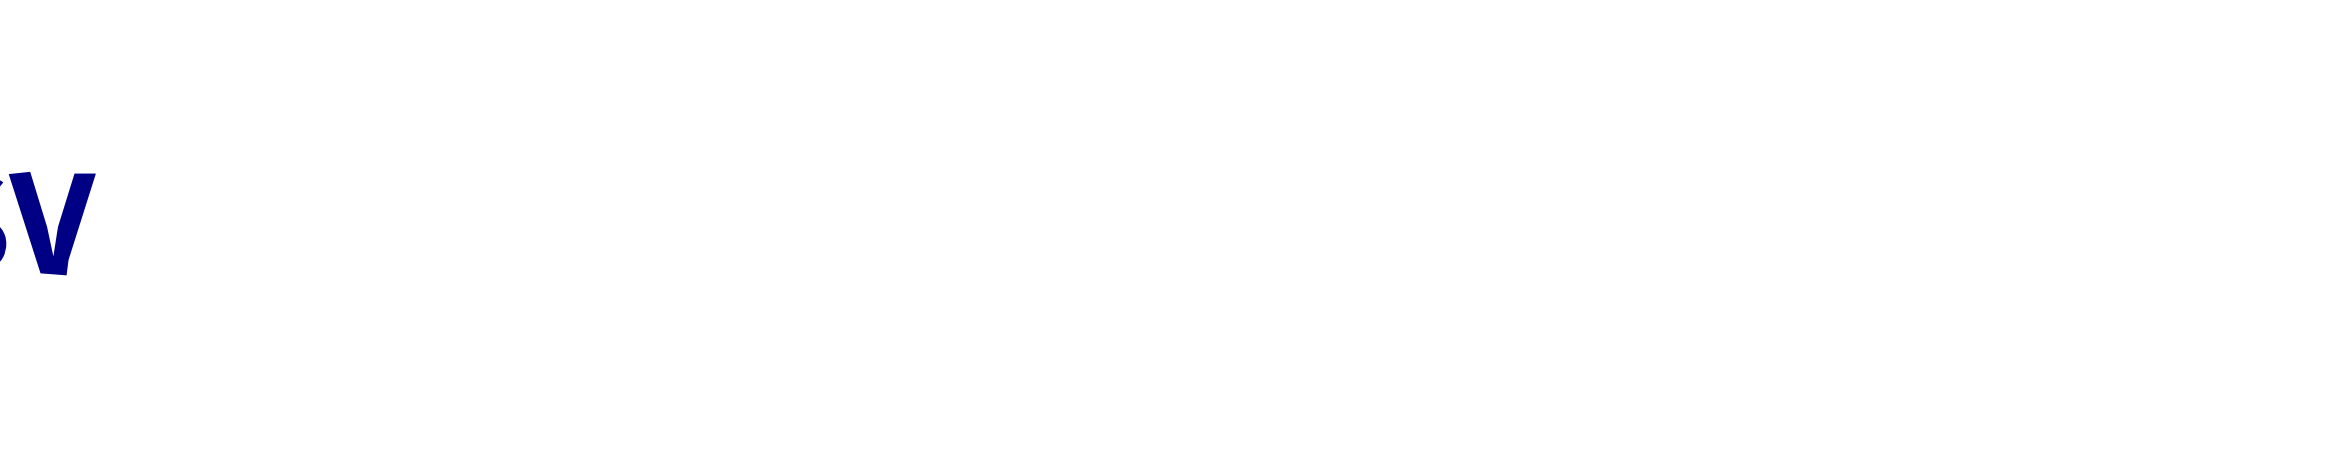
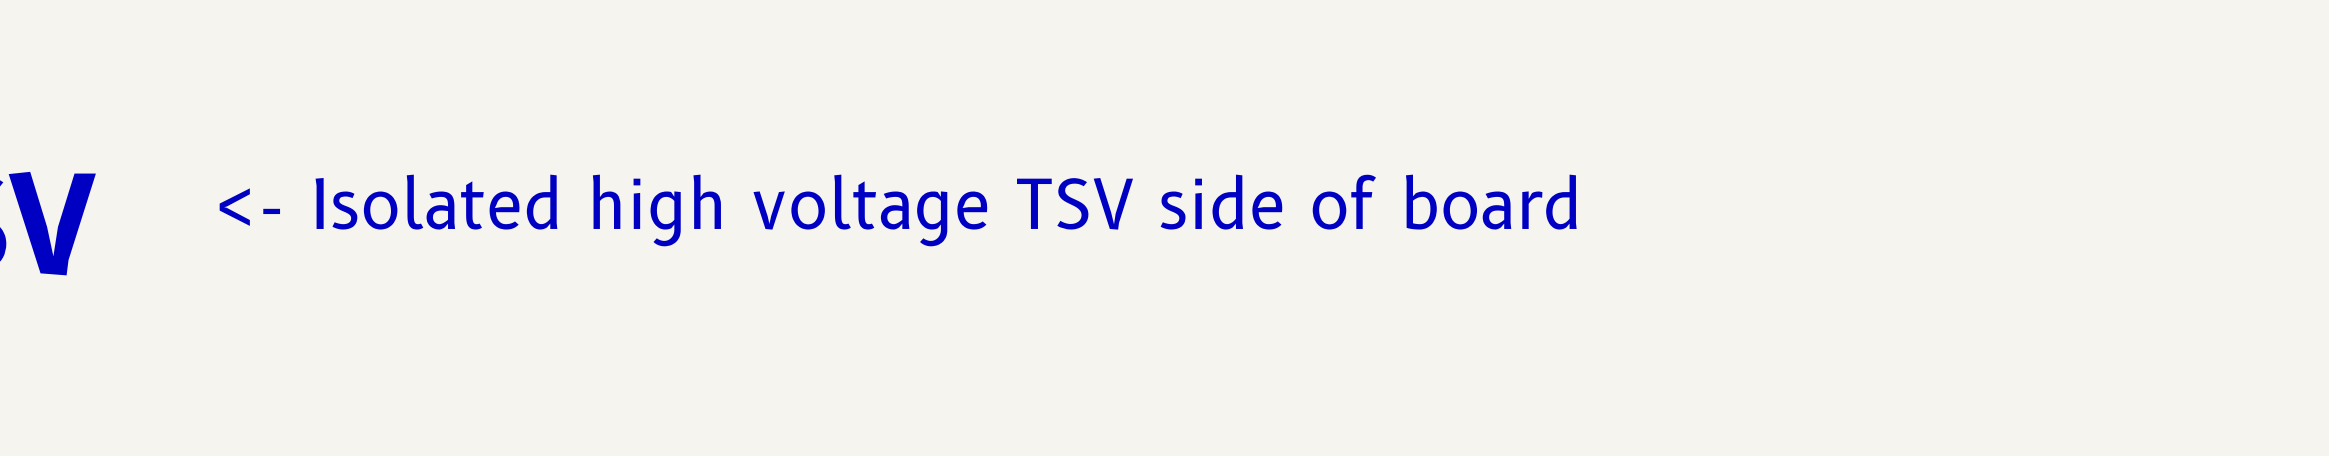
text: none -> <- Isolated high voltage TSV side of board (898, 210)

